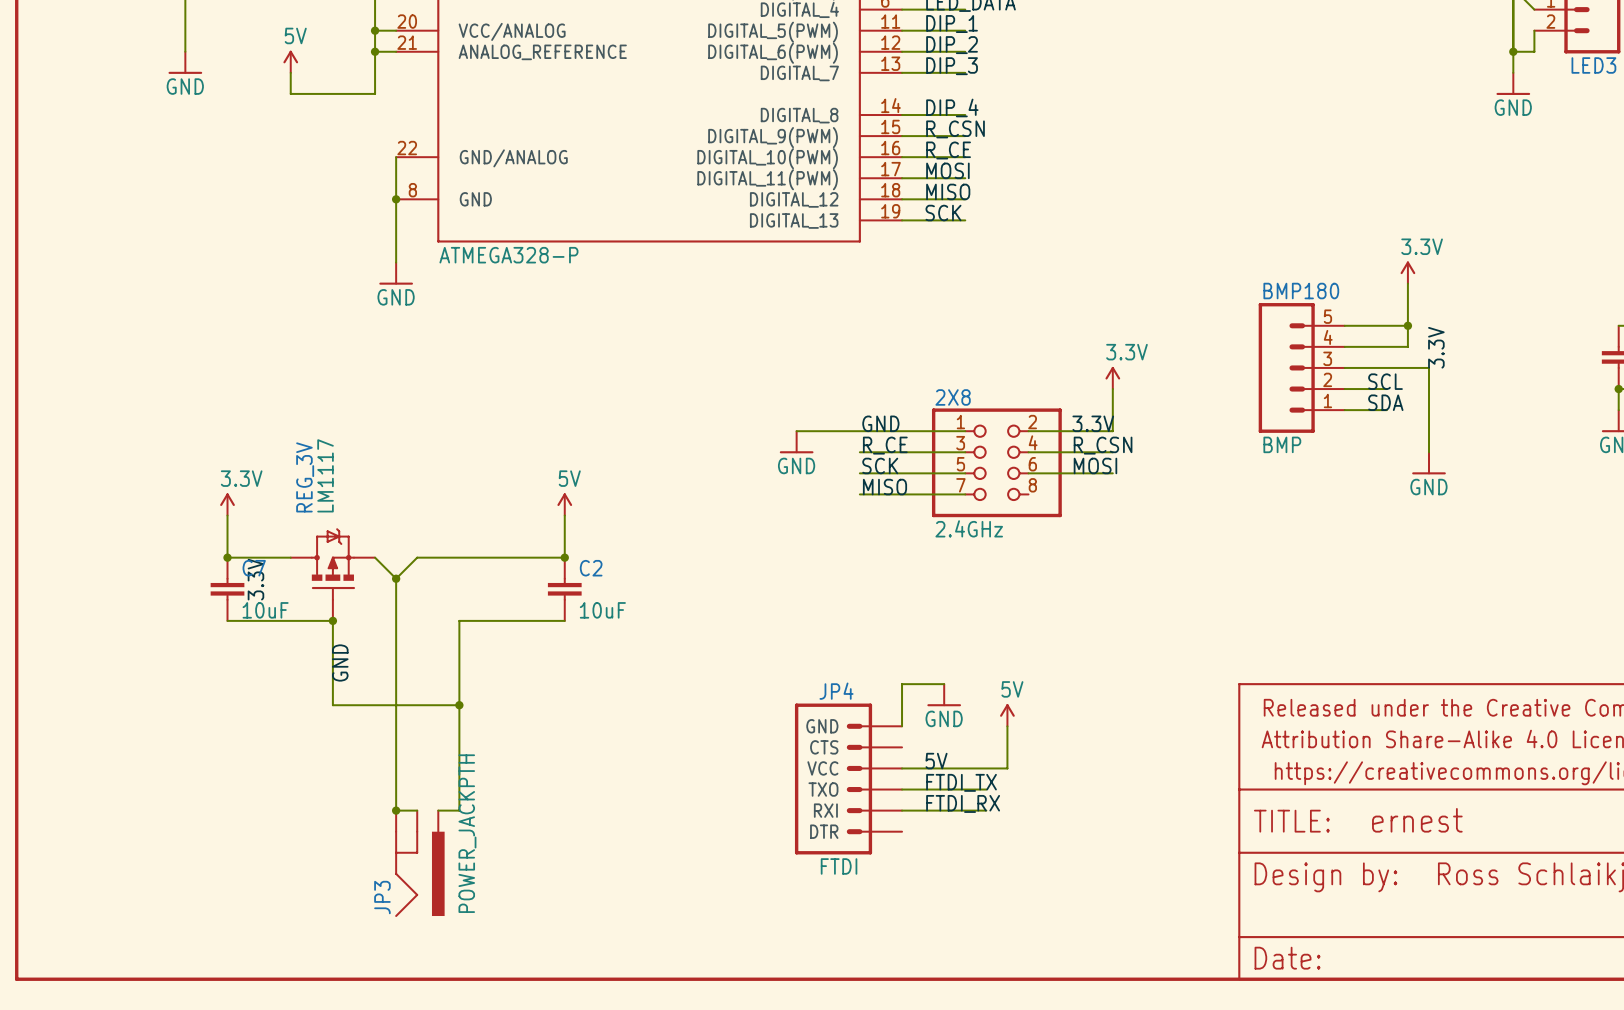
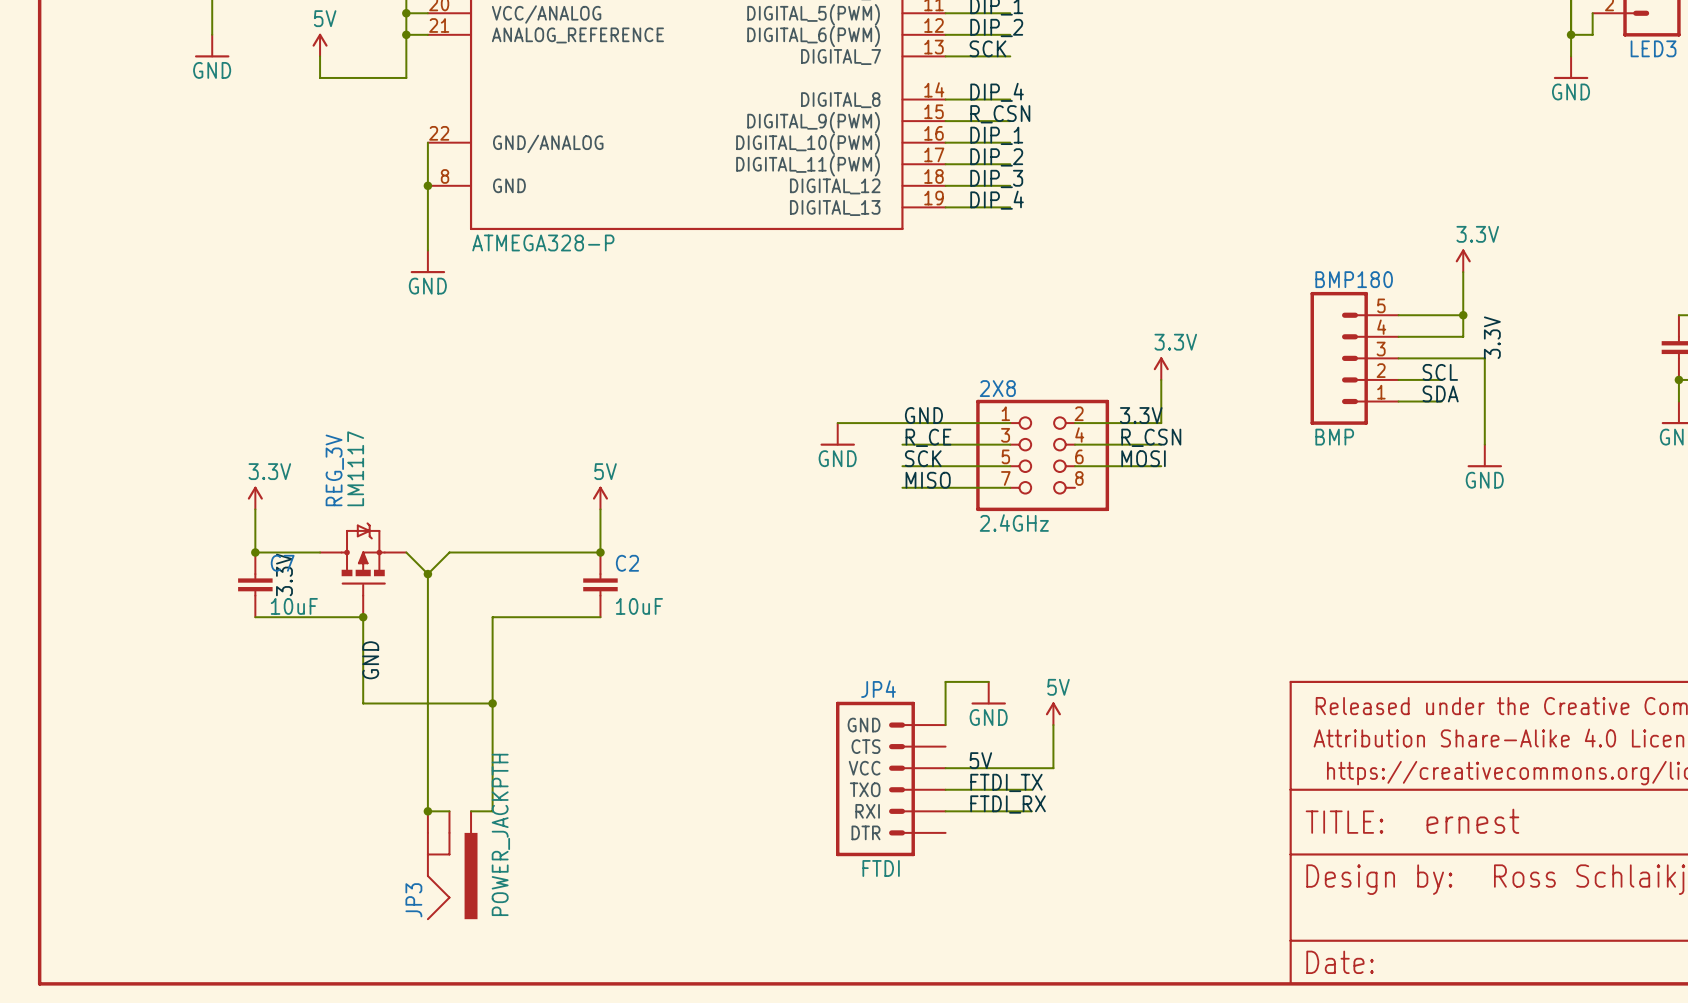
label: DIP_3 (952, 66) -> SCK (987, 48)
label: R_CE (948, 150) -> DIP_1 (996, 135)
label: MOSI (947, 170) -> DIP_2 (996, 157)
label: MISO (948, 191) -> DIP_3 (996, 178)
label: SCK (943, 213) -> DIP_4 (997, 200)

